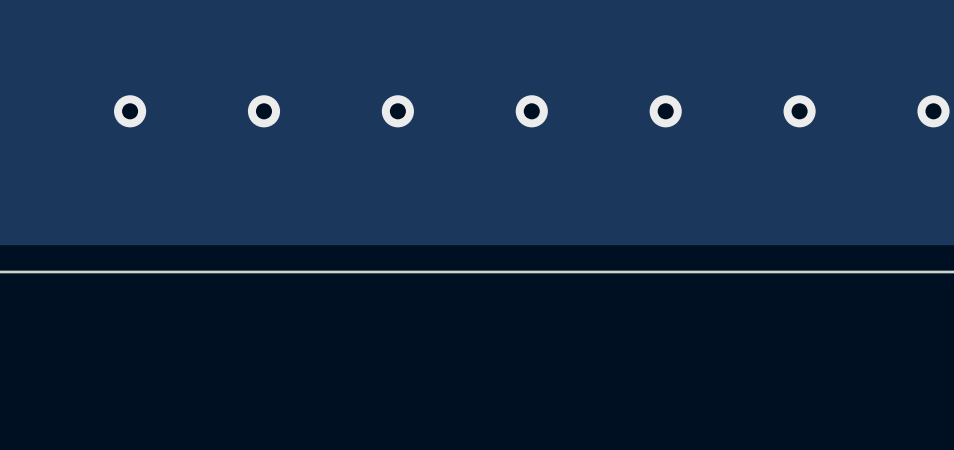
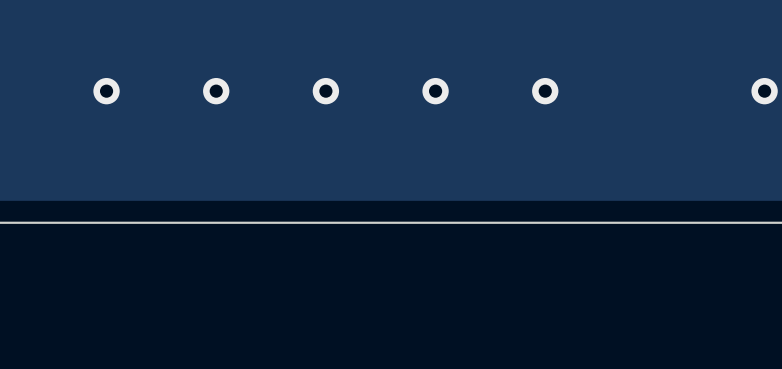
via: (799, 111) -> none

